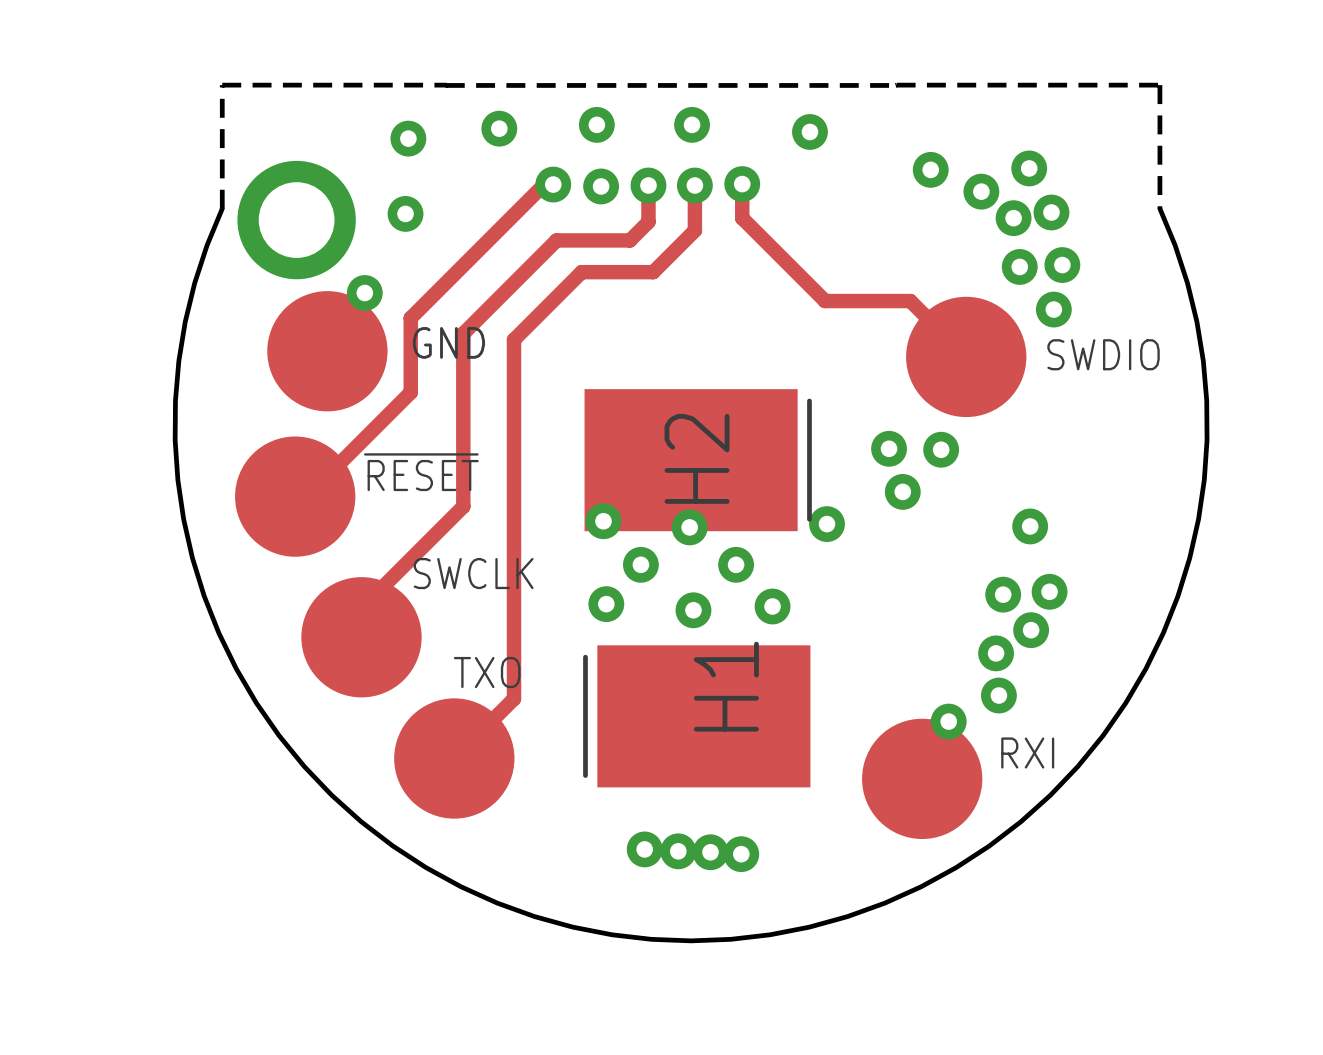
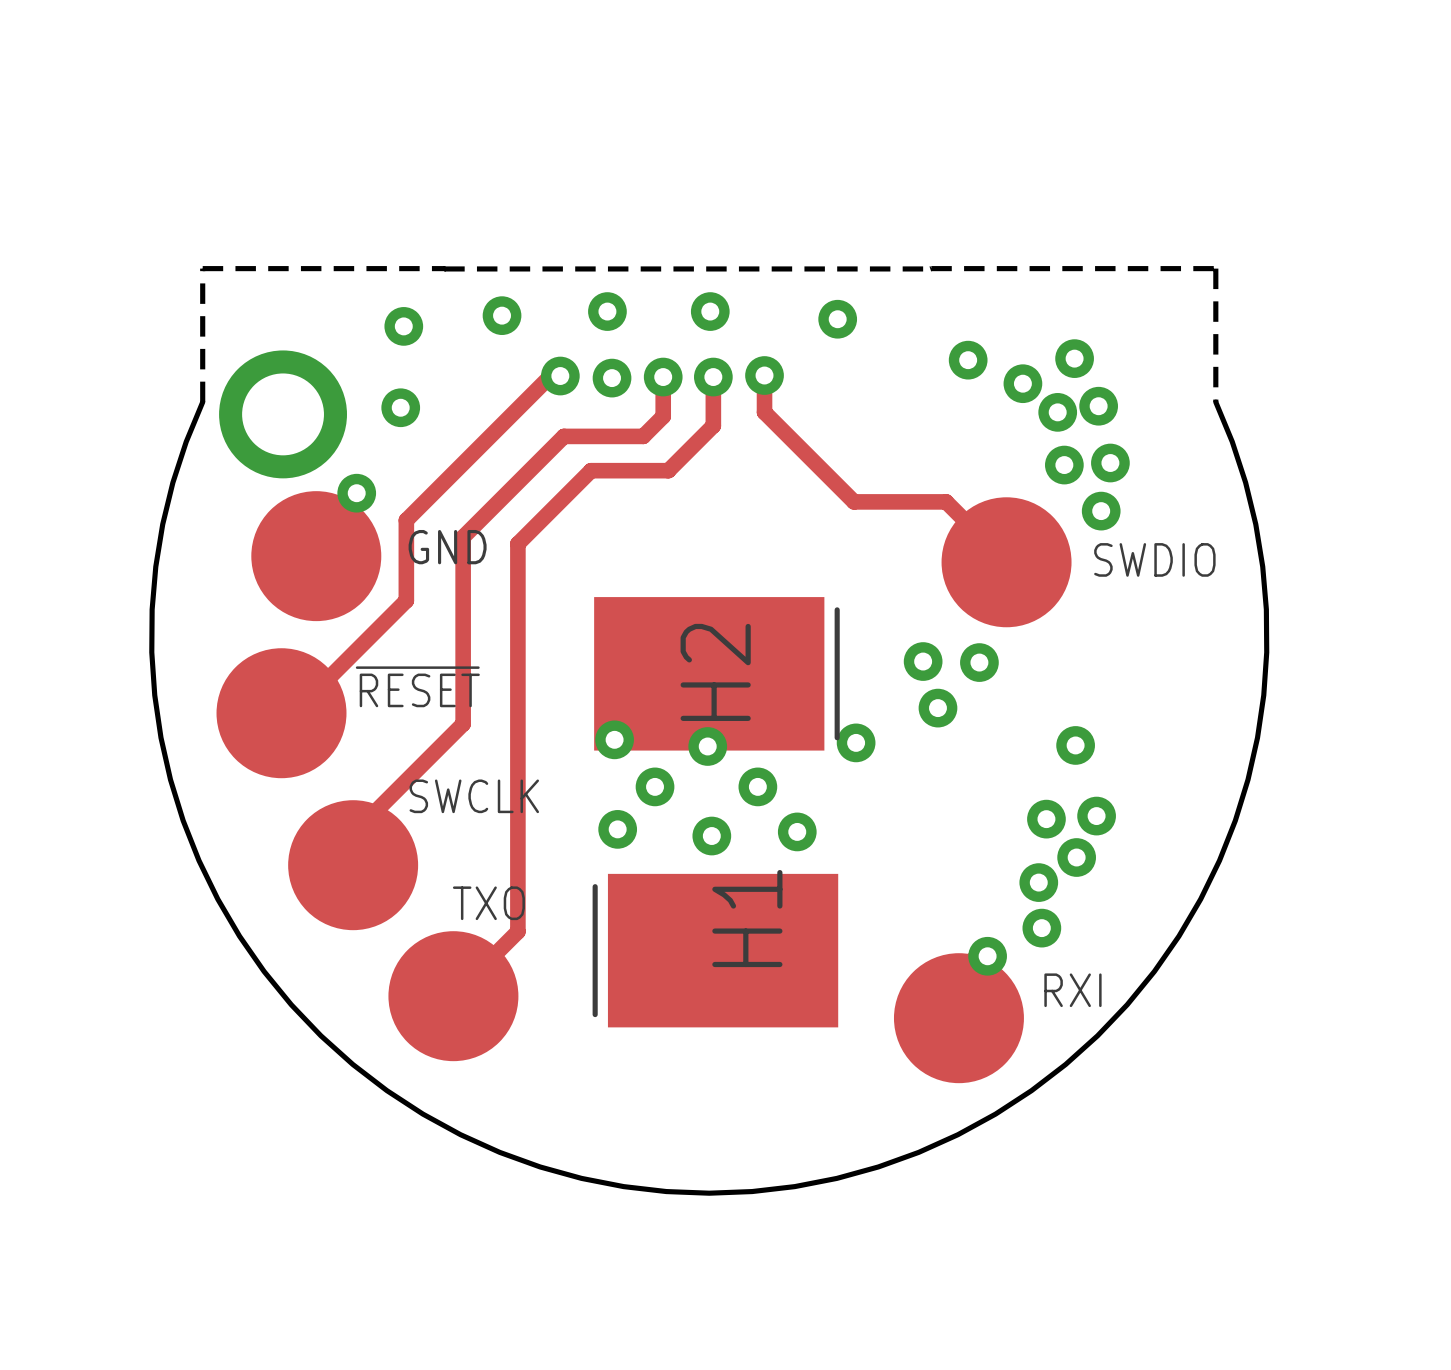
via: (644, 849) -> none
via: (678, 851) -> none
via: (710, 852) -> none
via: (741, 854) -> none

